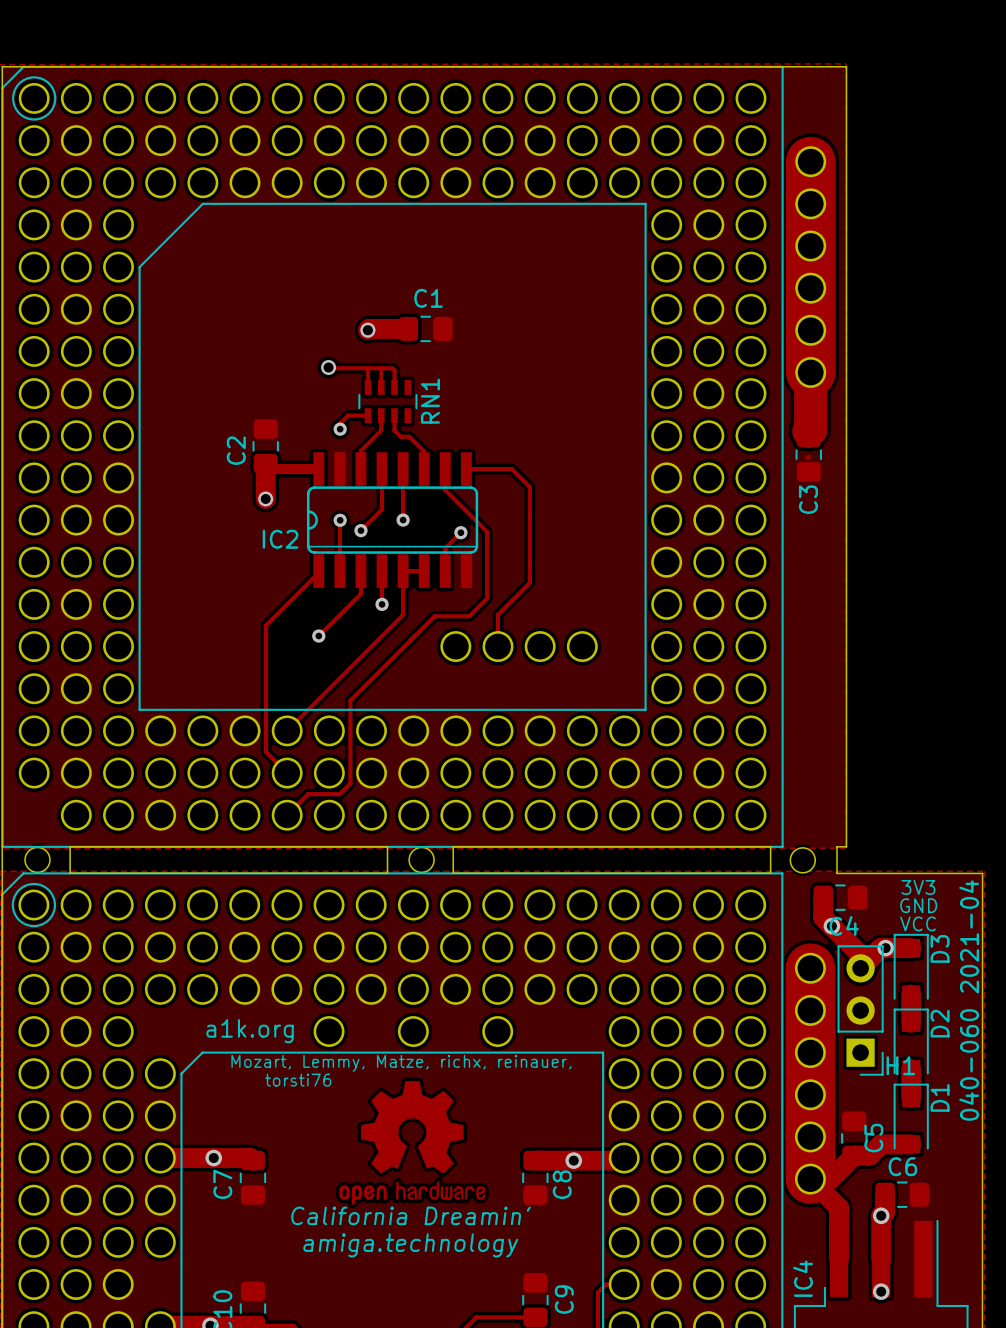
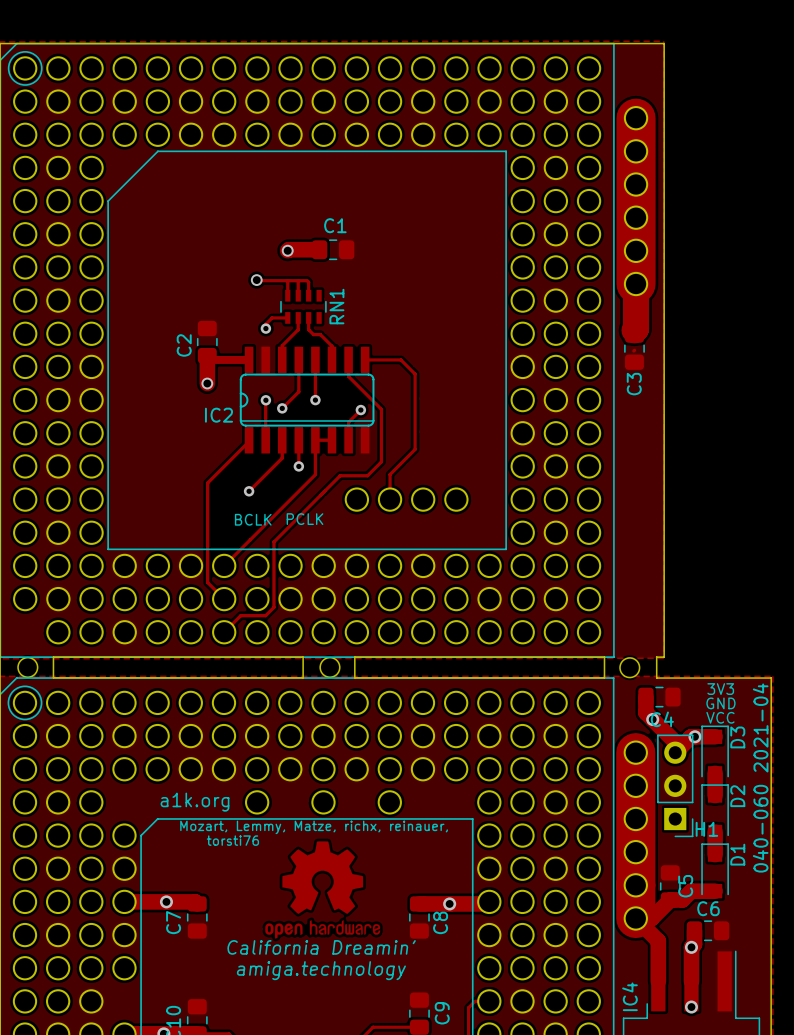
text: none -> PCLK (305, 519)
text: none -> BCLK (253, 519)

